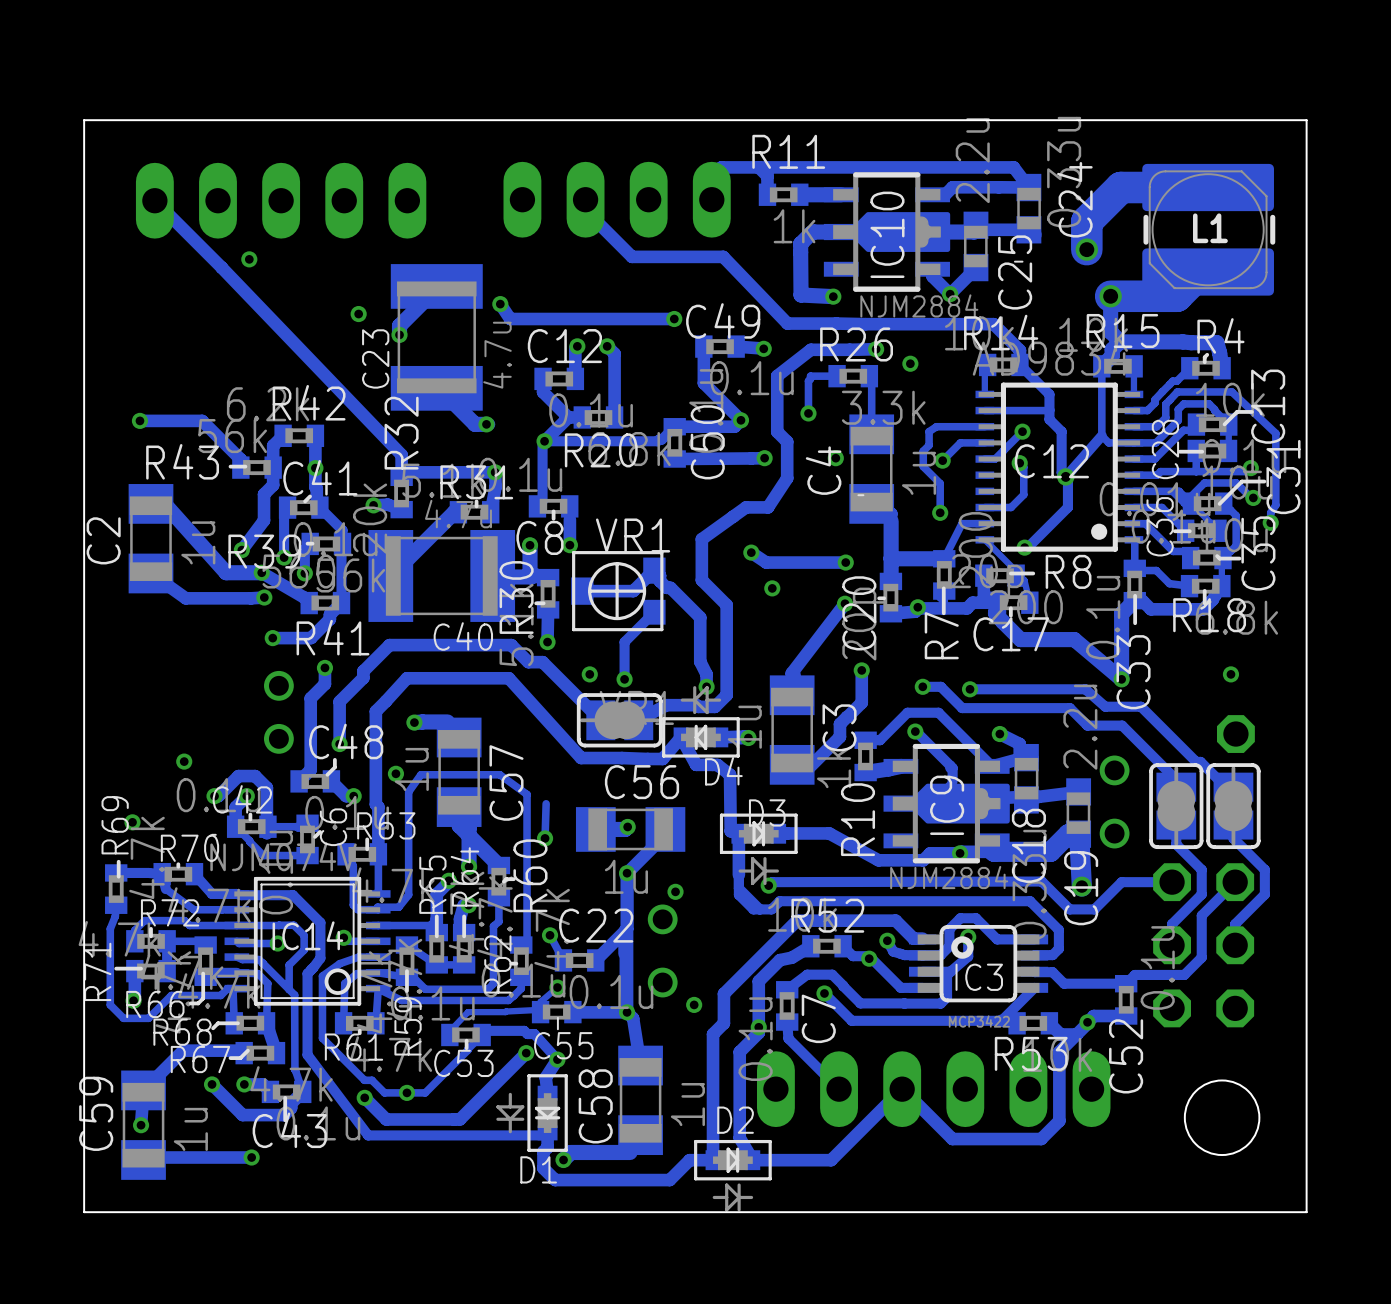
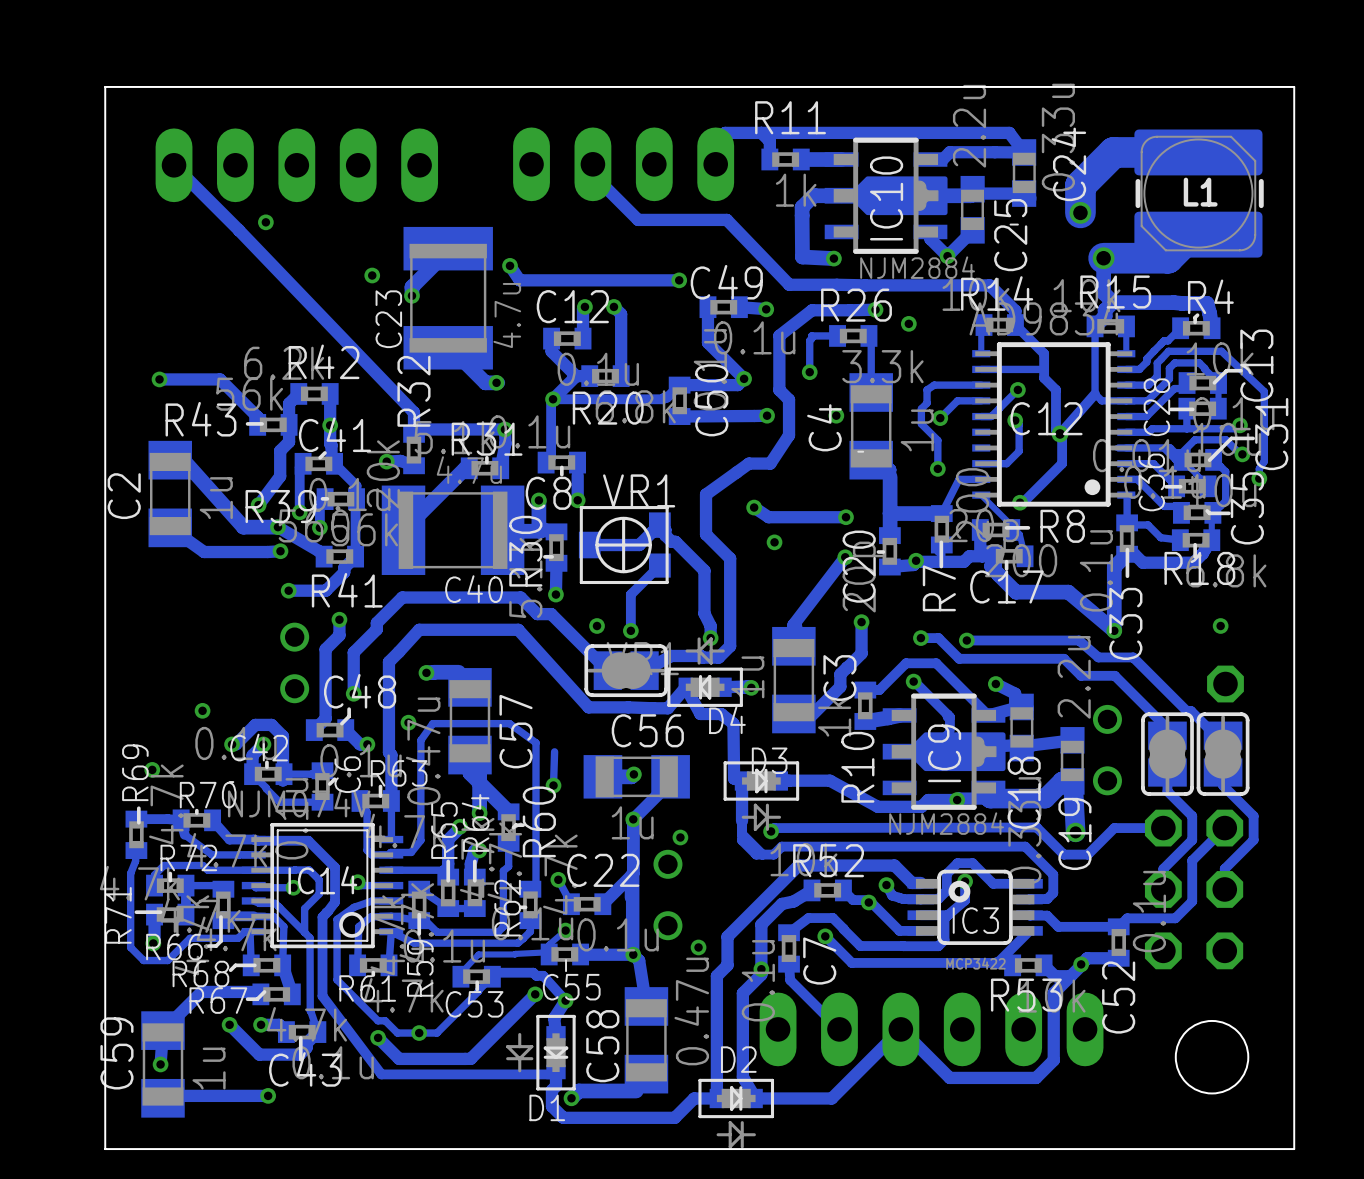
C57 value: 1u (411, 769) -> 0.47u (423, 751)
C58 value: 1u (687, 1104) -> 0.47u (691, 1011)

